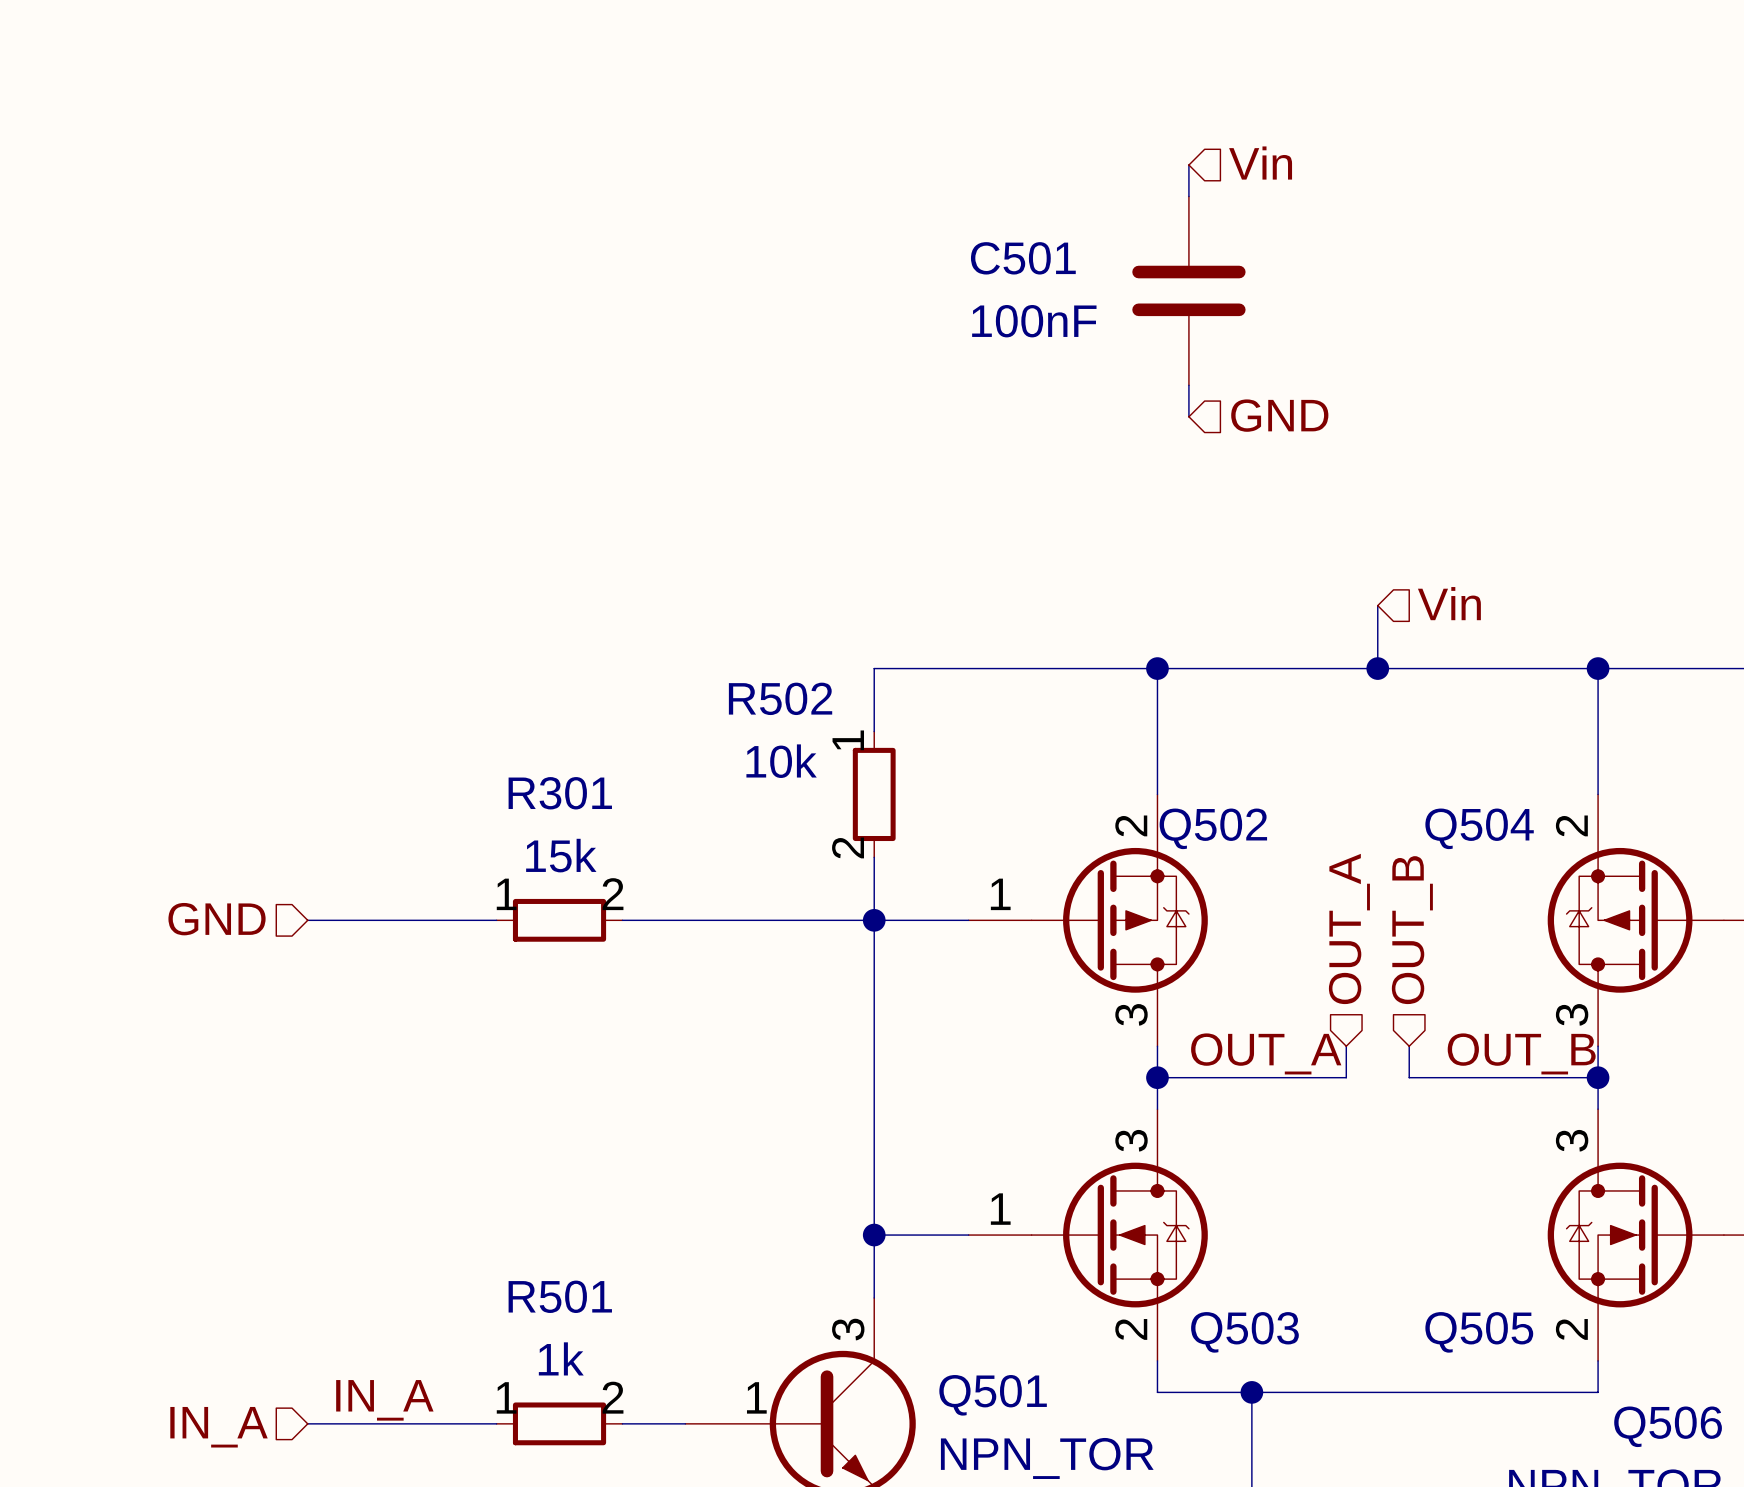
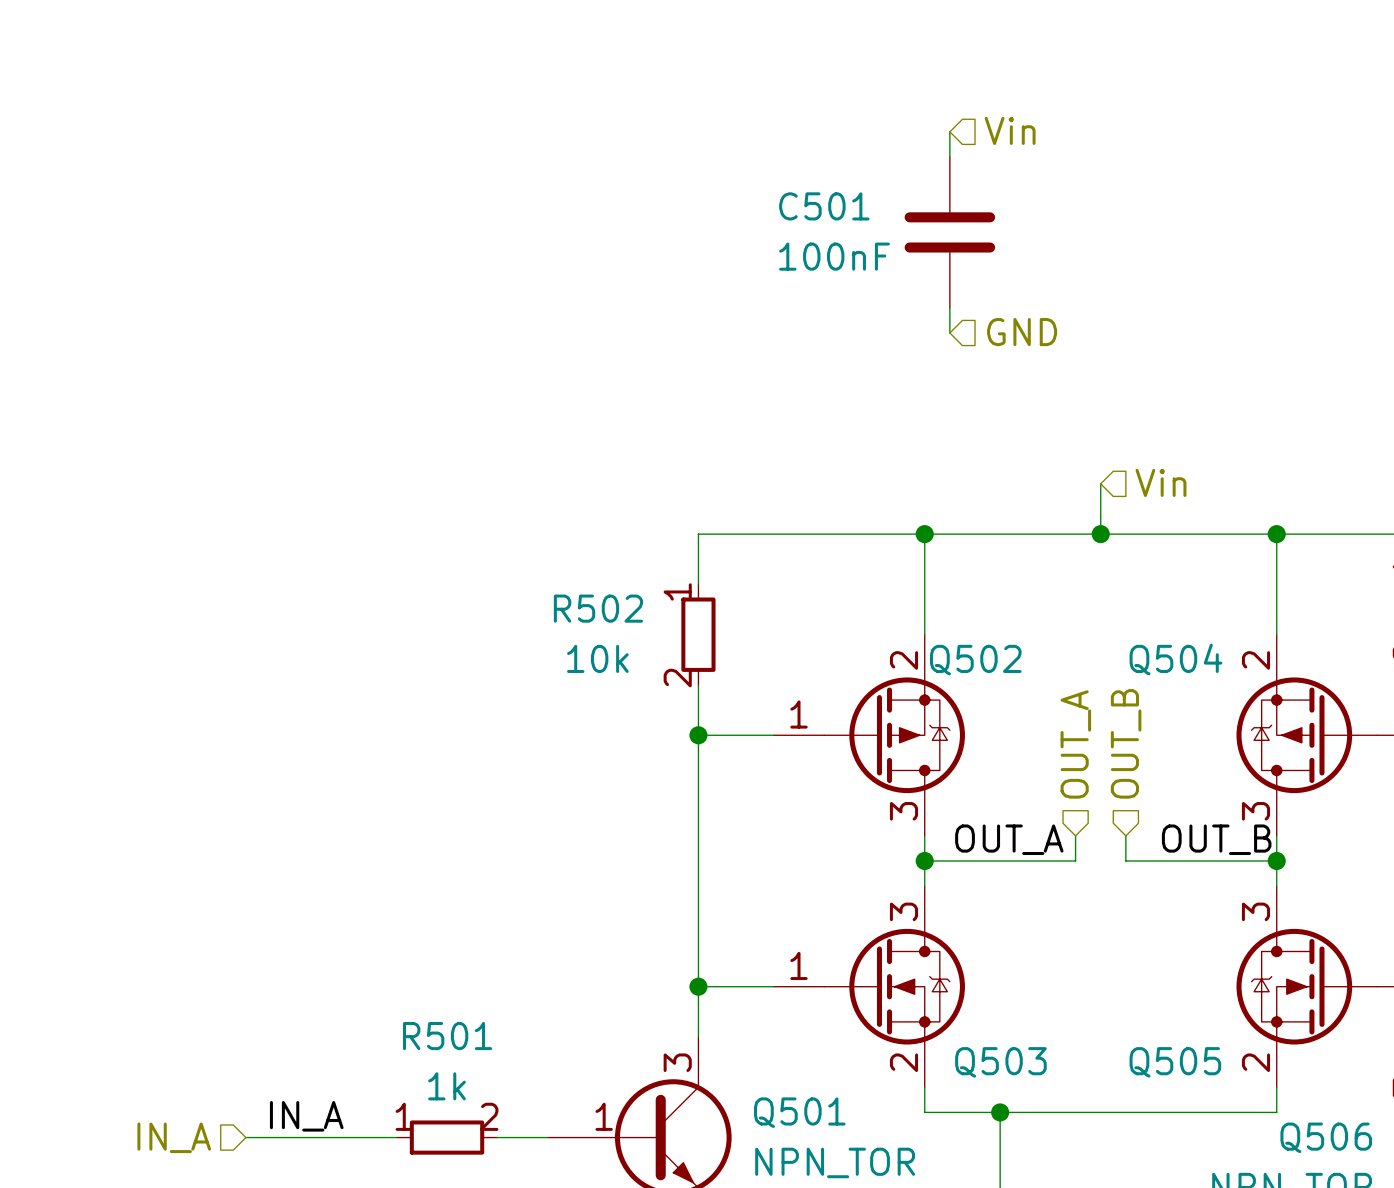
R502 name position: R502 (780, 698) -> R502 (598, 608)
R502 value position: 10k (781, 761) -> 10k (597, 658)
hierarchical label: GND (217, 919) -> none
wire: (307, 920) (496, 920) -> none
R301: 15k (559, 920) -> none
wire: (622, 920) (874, 920) -> none

